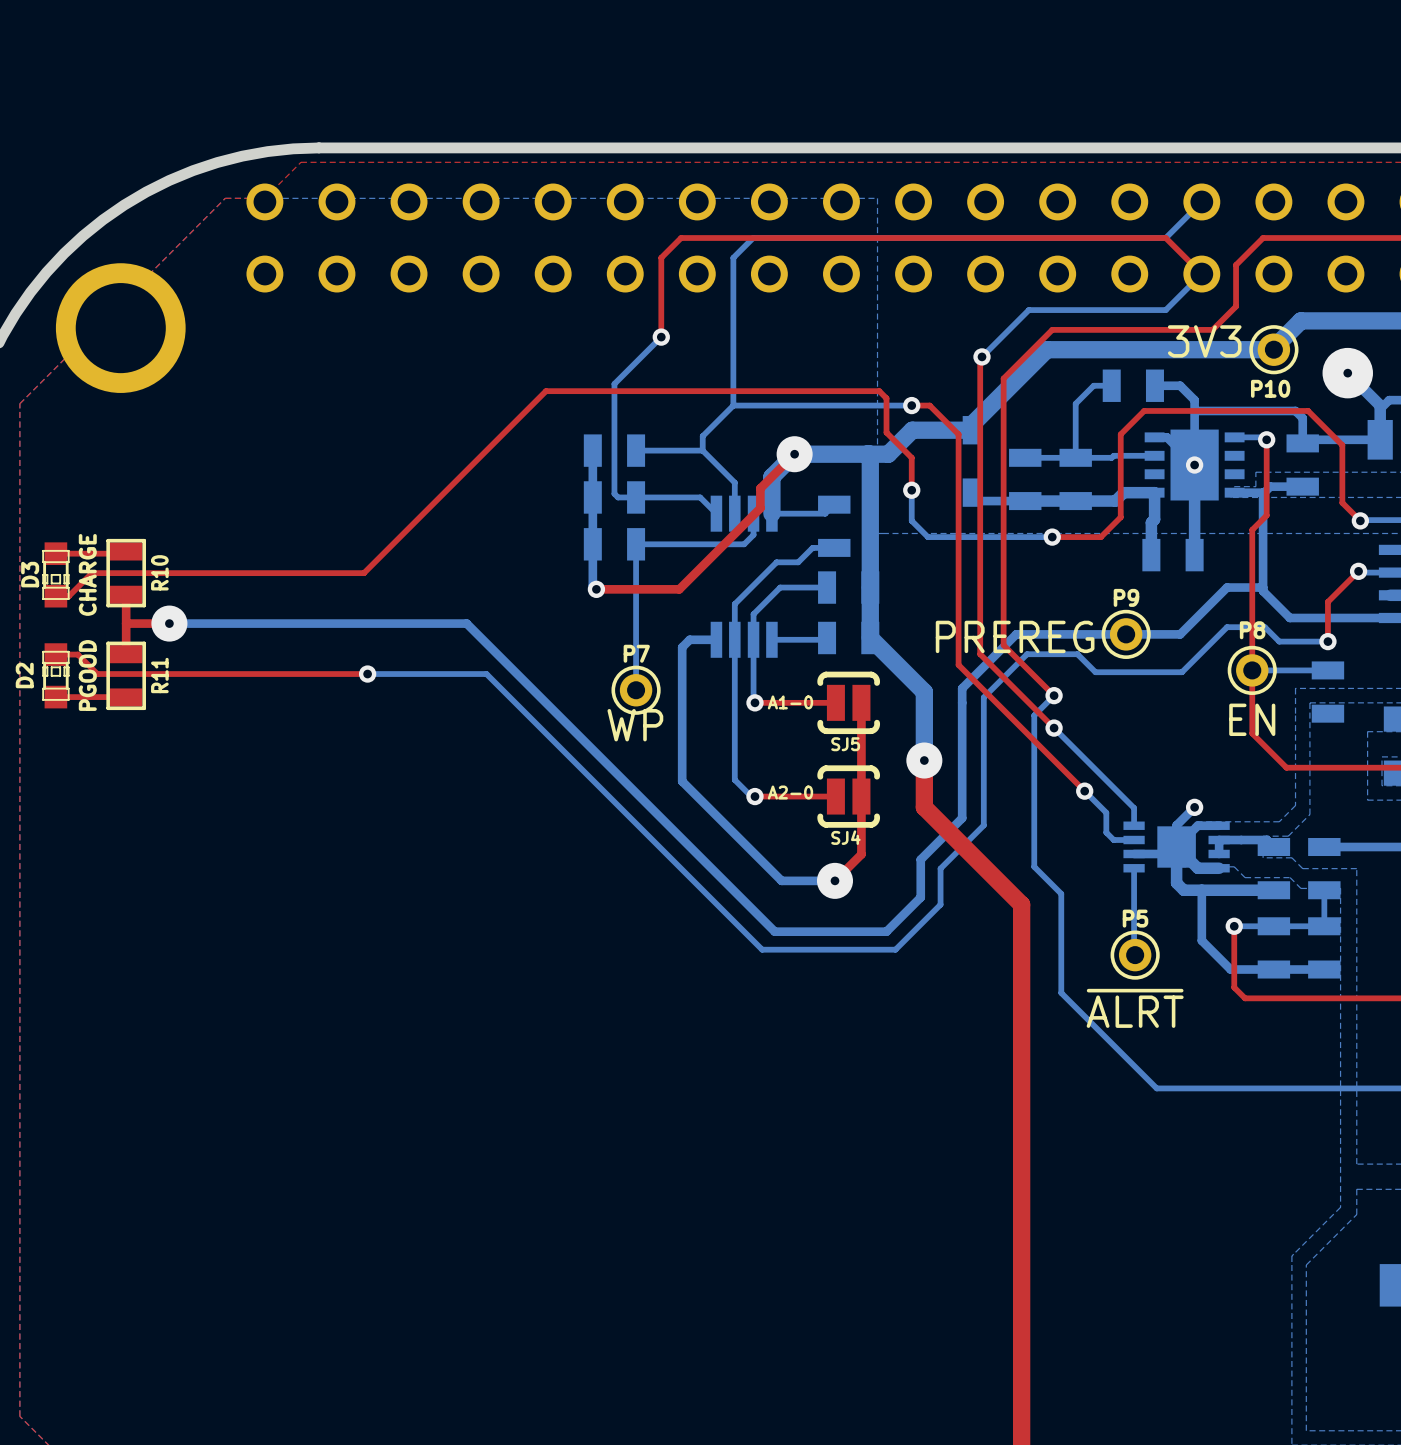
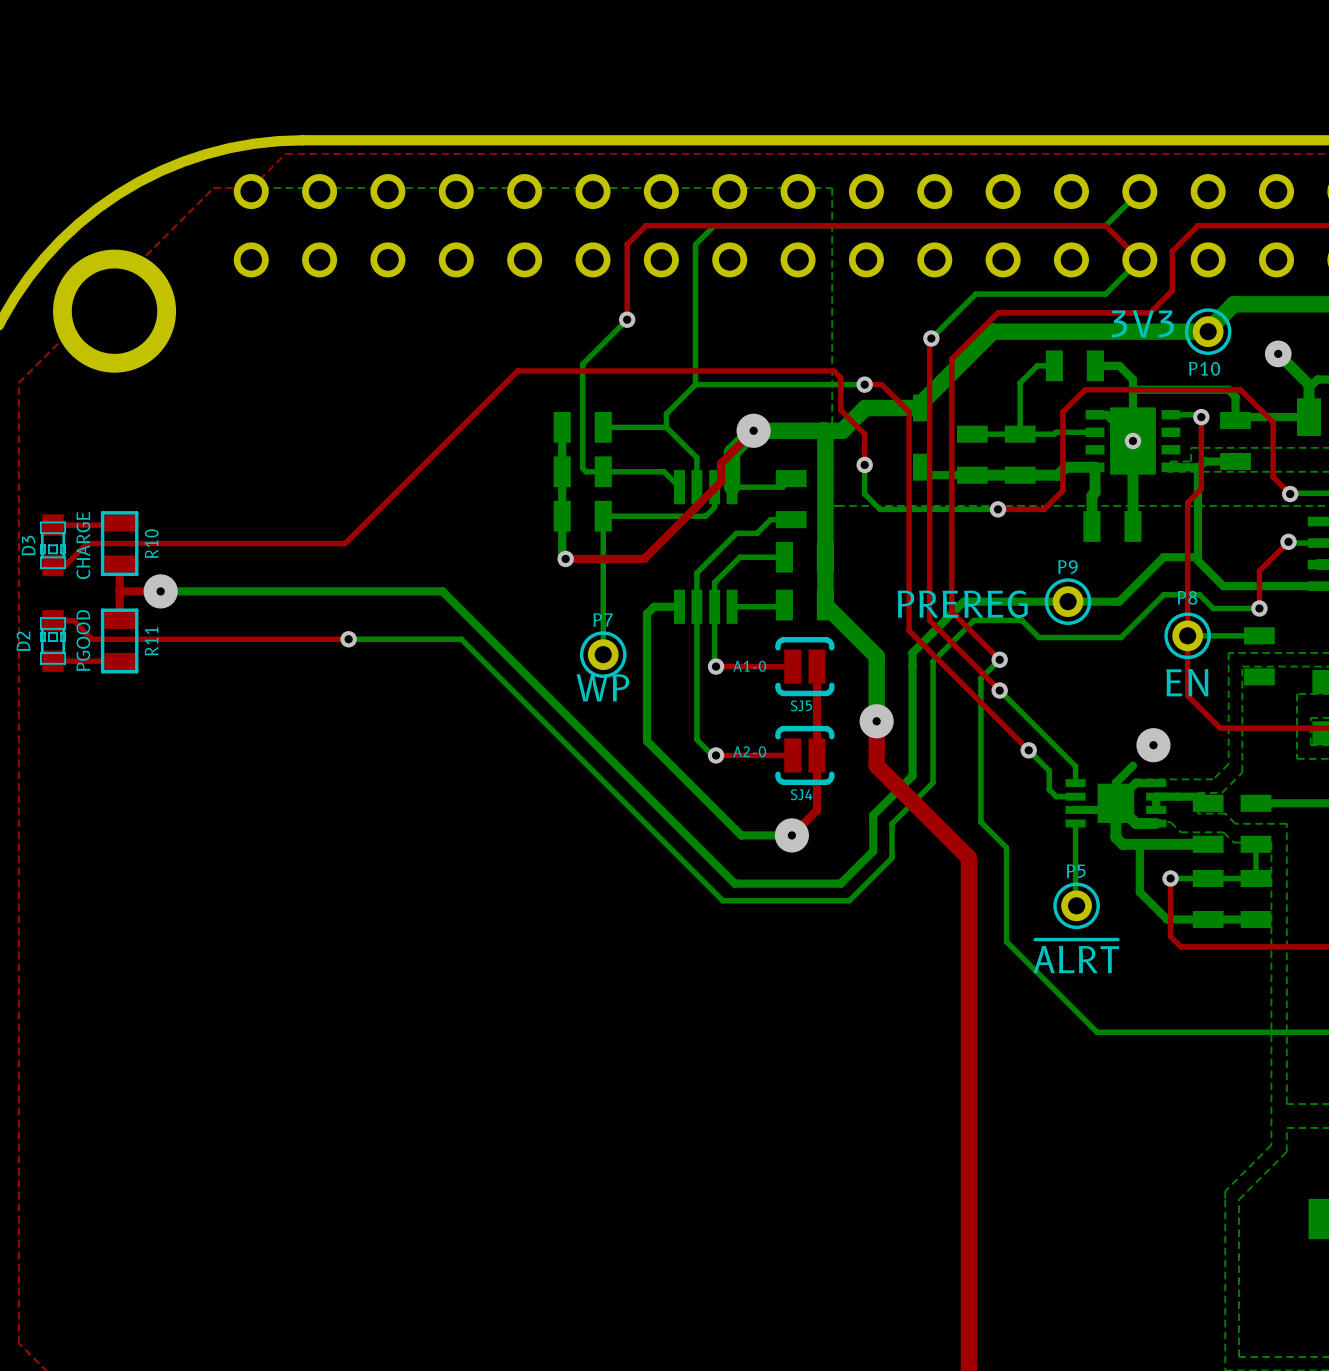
via size: [1322, 347, 1373, 399] -> [1264, 340, 1292, 368]
via: none -> (1153, 745)
via: (1194, 807) -> none

